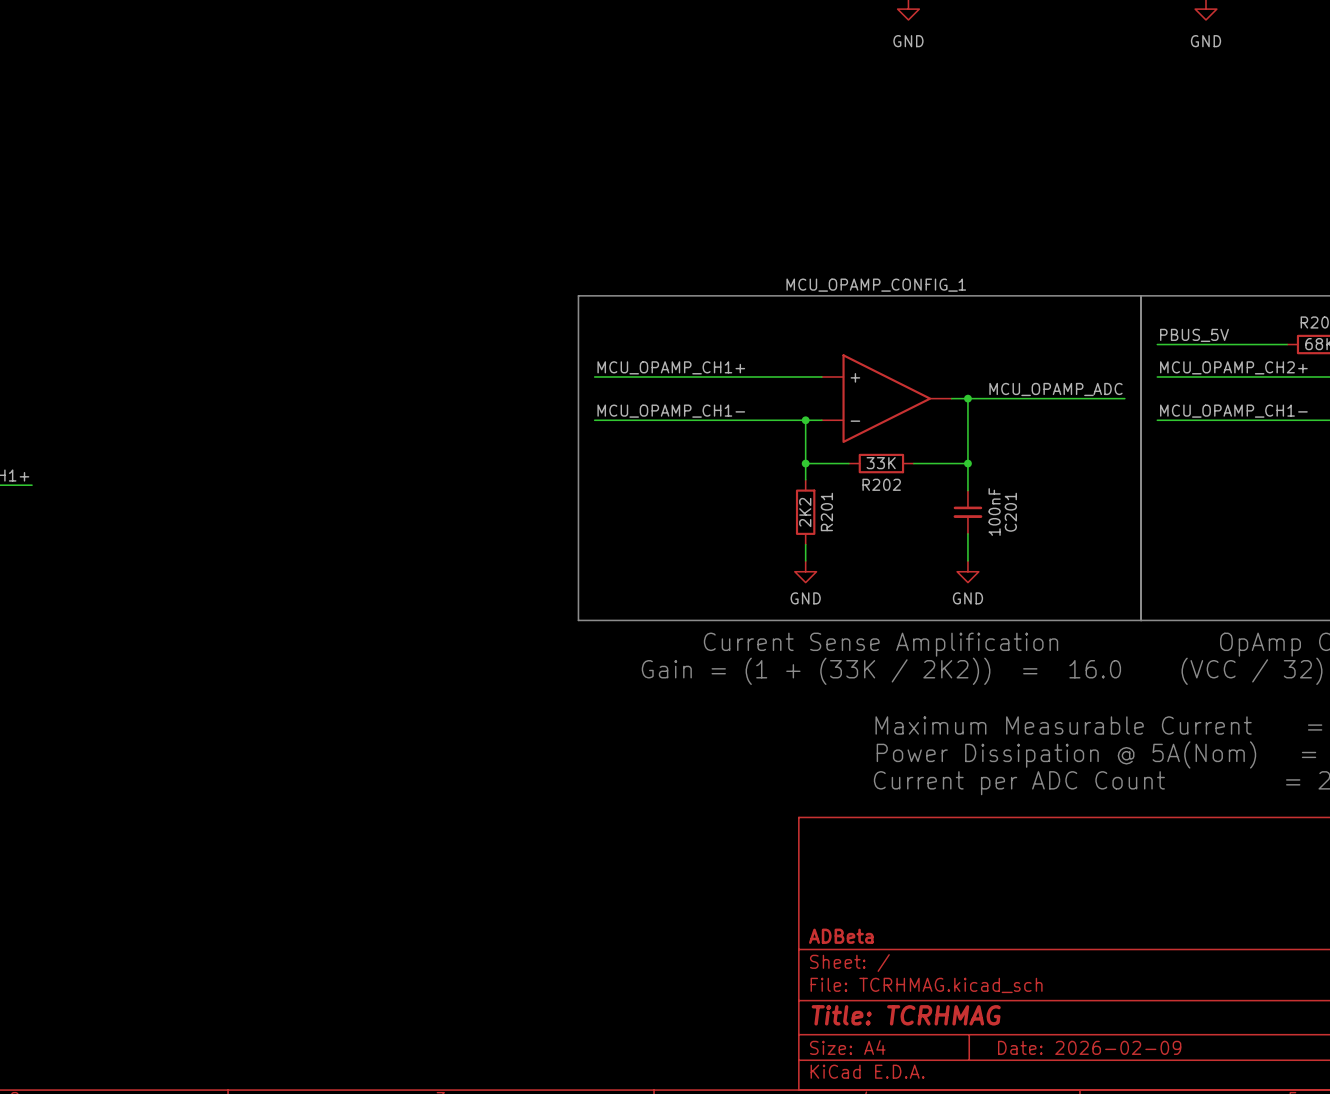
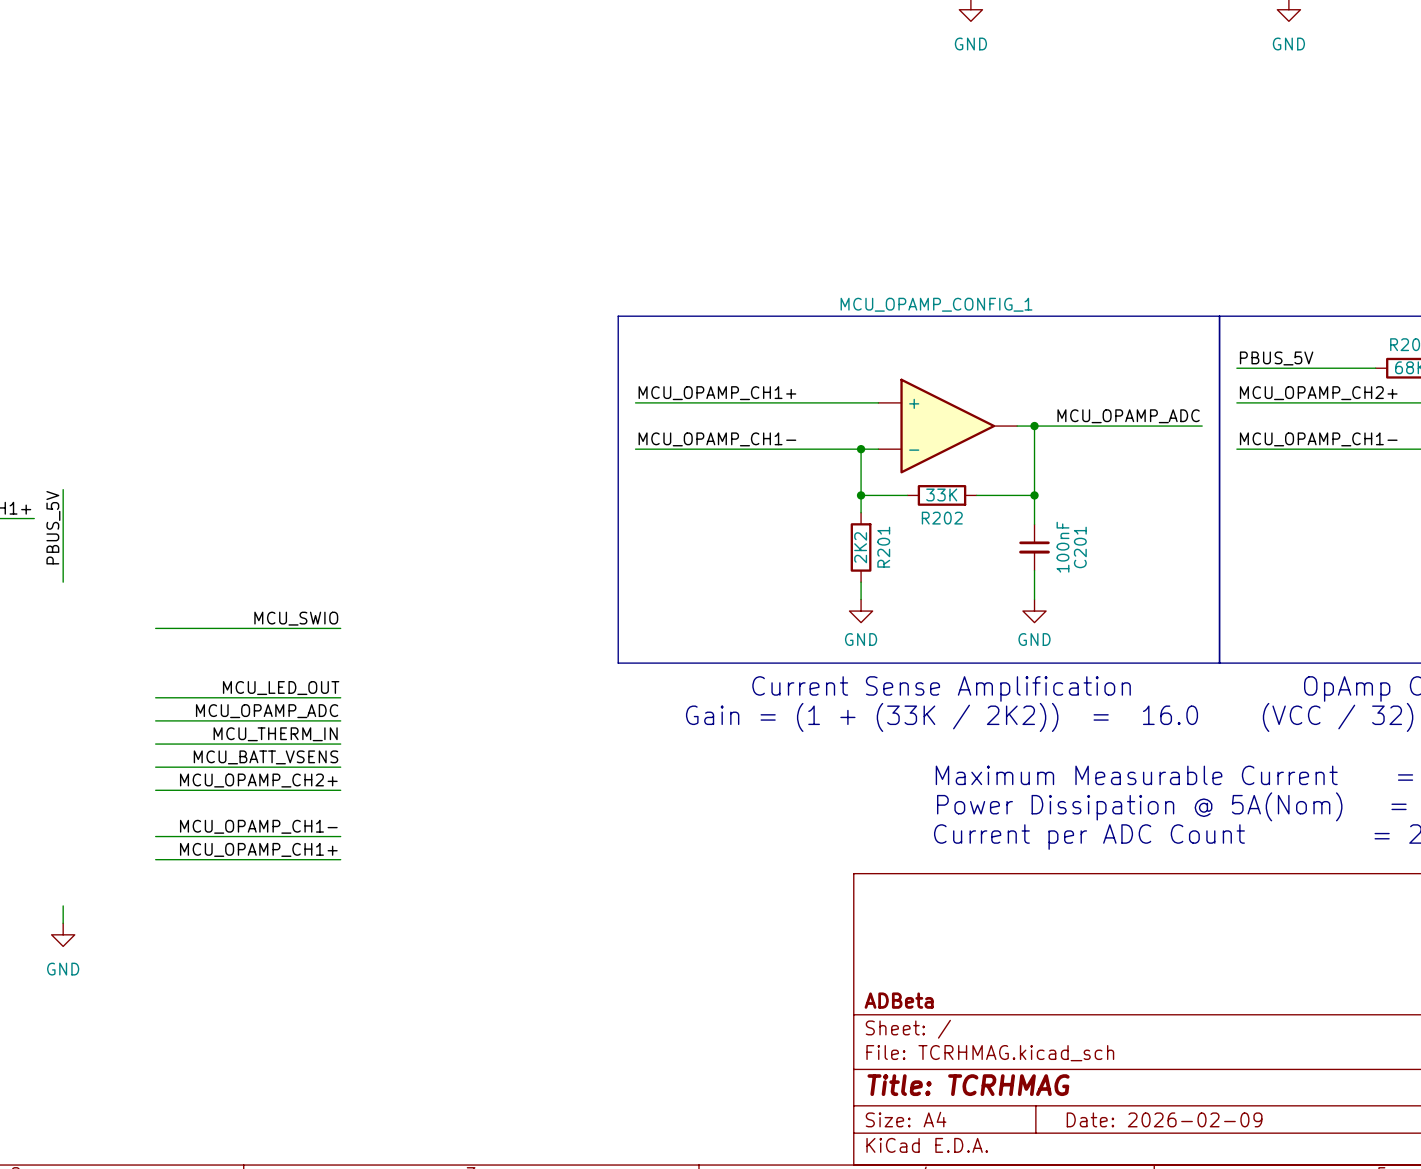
wire: none -> (63, 489) (63, 582)
label: none -> PBUS_5V (53, 527)
label: none -> MCU_SWIO (296, 618)
wire: none -> (155, 628) (340, 628)
label: none -> MCU_LED_OUT (281, 688)
wire: none -> (155, 697) (340, 697)
label: none -> MCU_OPAMP_ADC (267, 711)
wire: none -> (155, 720) (340, 720)
label: none -> MCU_THERM_IN (275, 734)
wire: none -> (155, 744) (340, 744)
label: none -> MCU_BATT_VSENS (265, 757)
wire: none -> (155, 767) (340, 767)
label: none -> MCU_OPAMP_CH2+ (258, 780)
wire: none -> (155, 790) (340, 790)
label: none -> MCU_OPAMP_CH1- (258, 826)
wire: none -> (155, 836) (340, 836)
label: none -> MCU_OPAMP_CH1+ (258, 849)
wire: none -> (155, 859) (340, 859)
wire: none -> (63, 905) (63, 923)
power symbol: none -> GND (63, 934)

